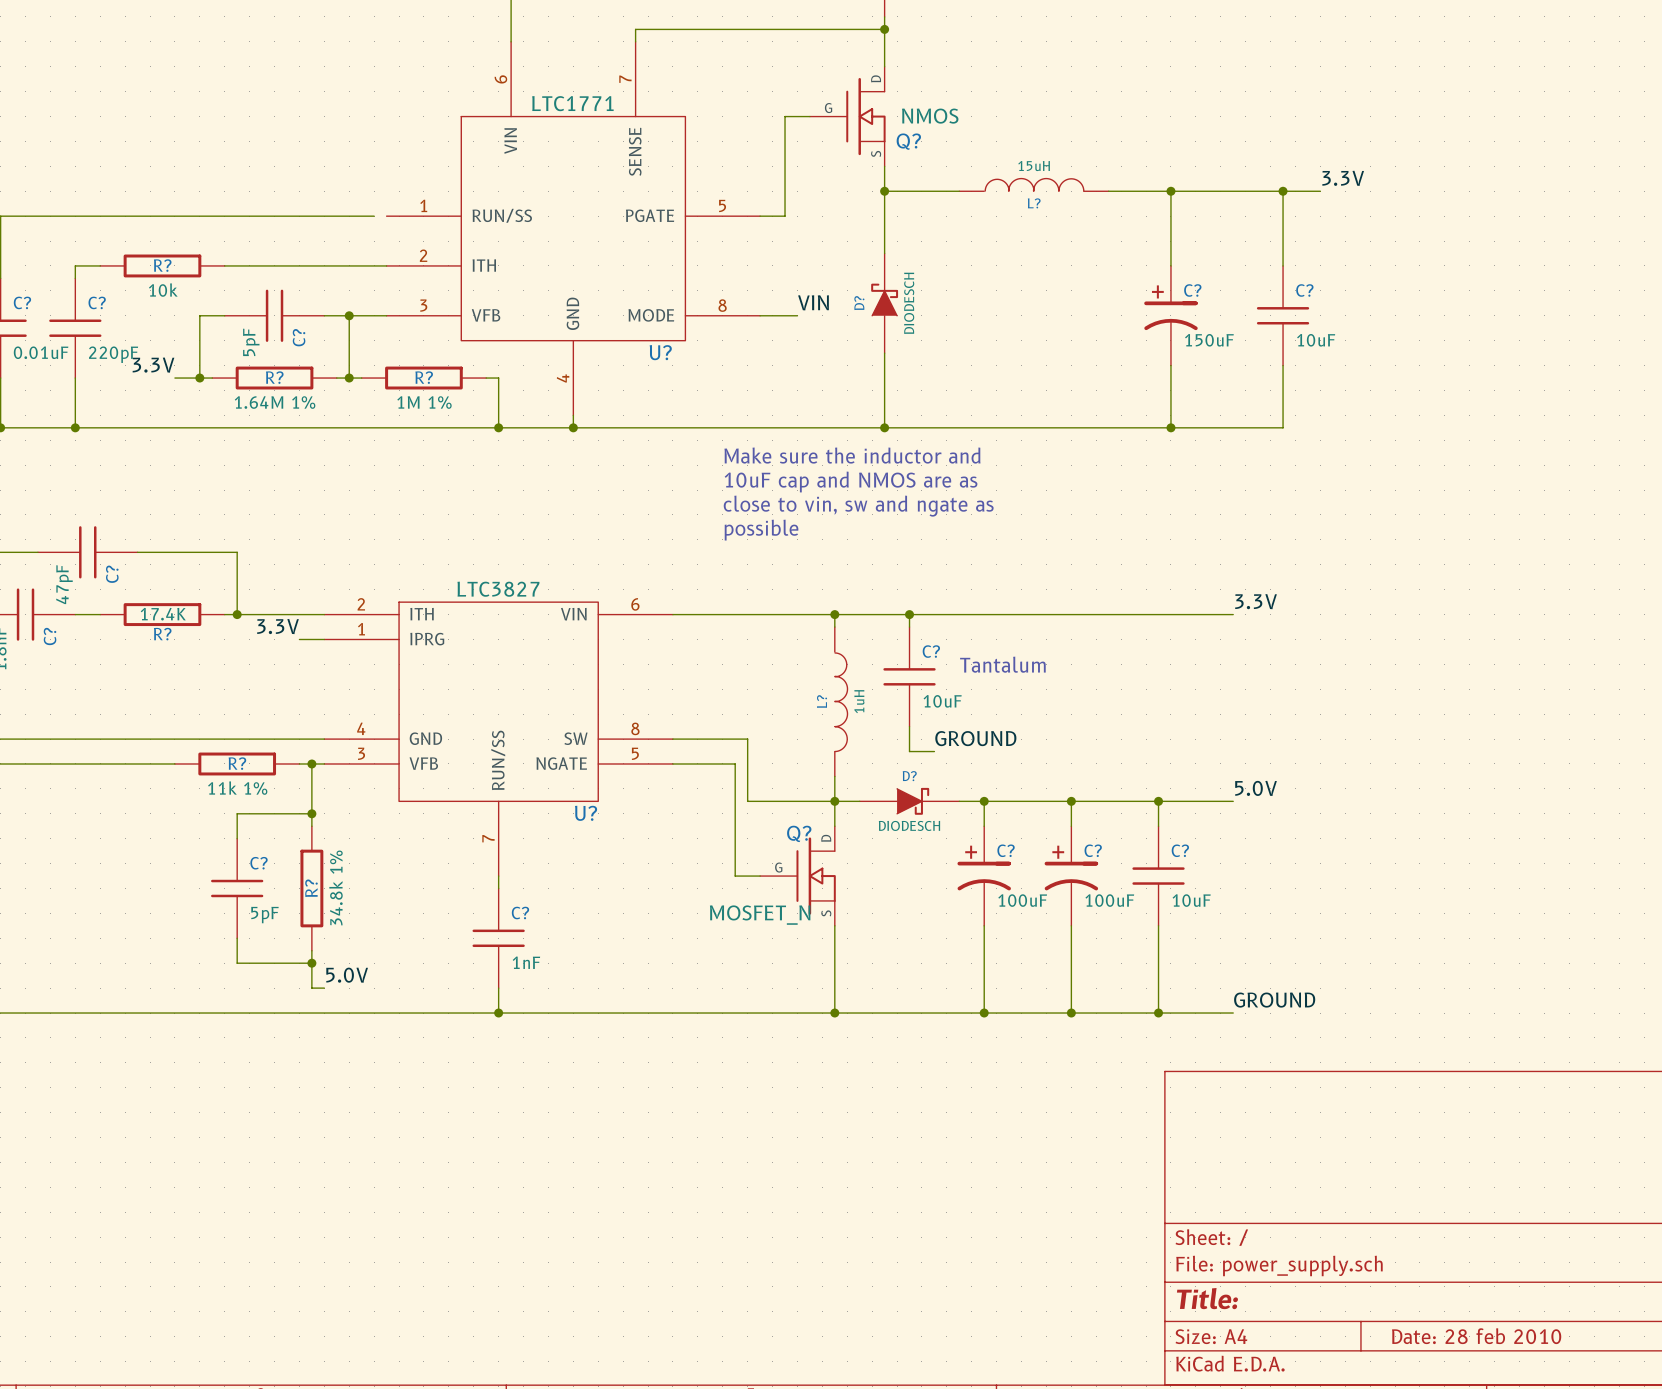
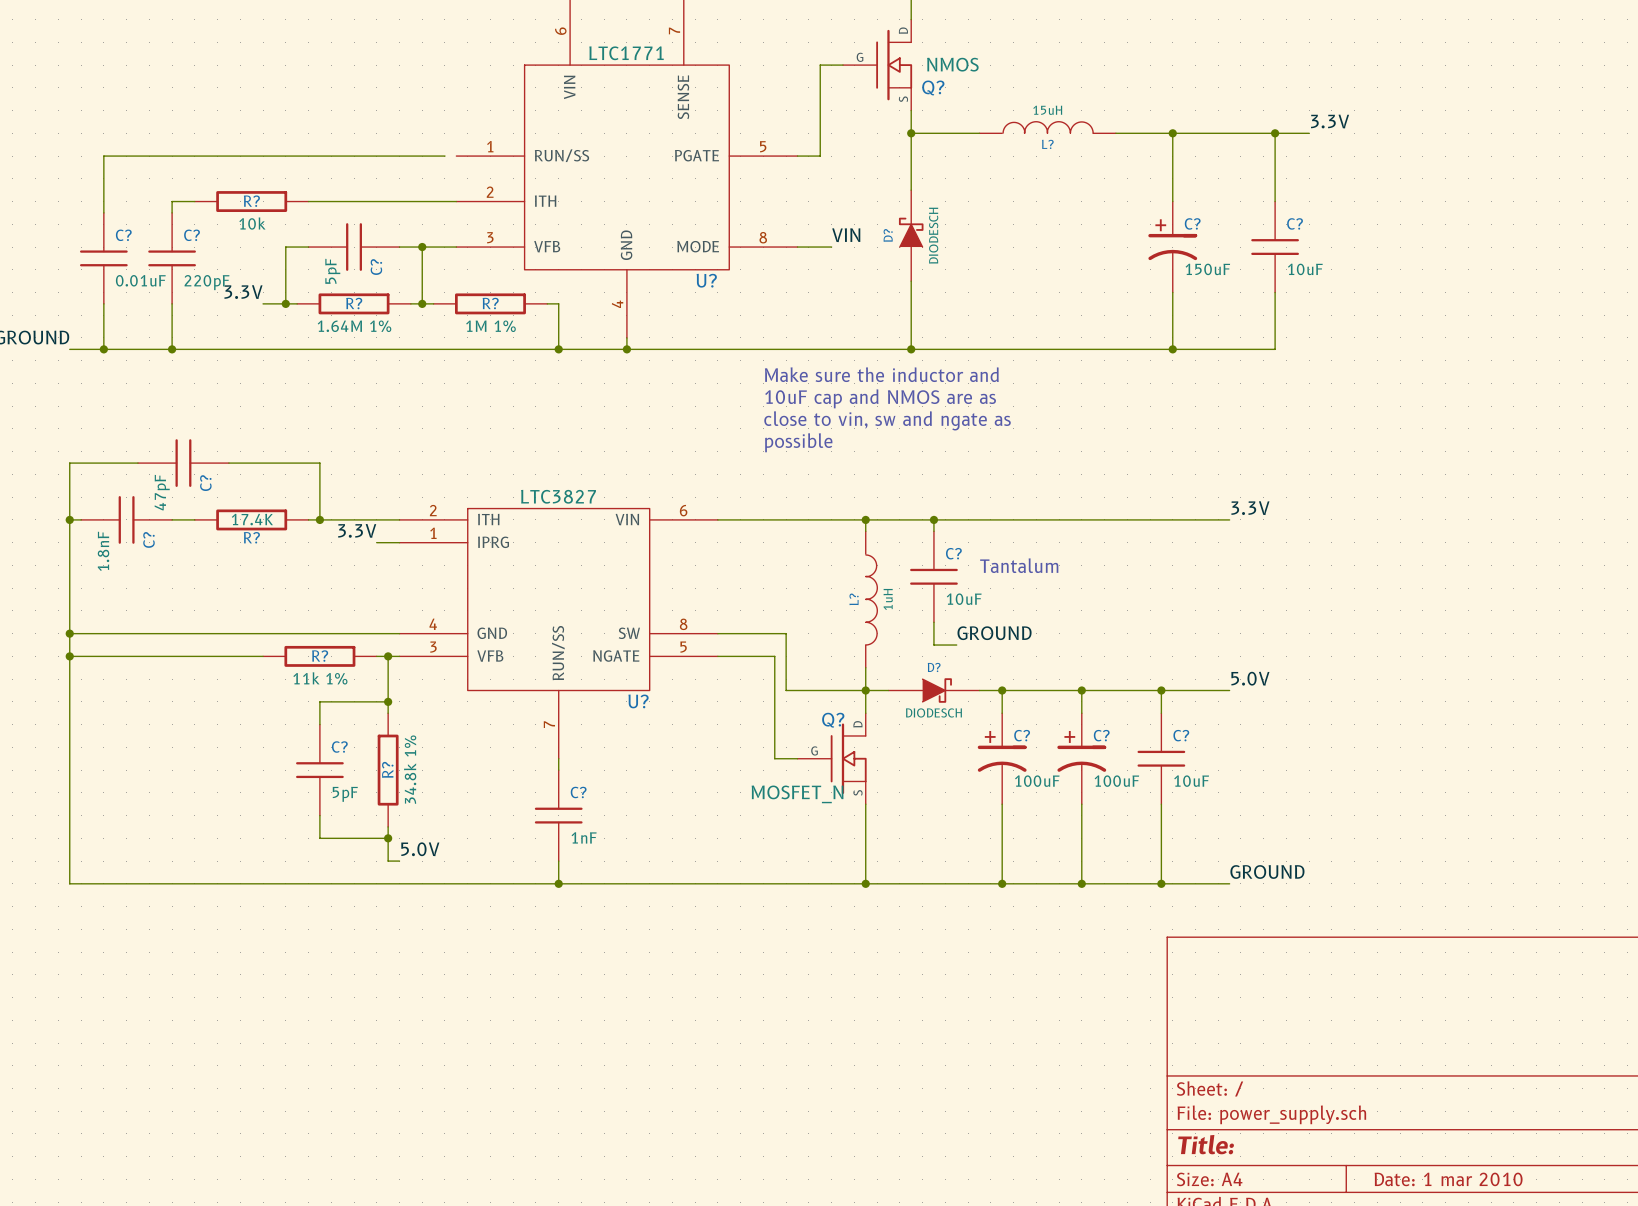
title block: Date: 28 feb 2010 (1476, 1336) -> Date: 1 mar 2010 (1448, 1179)

